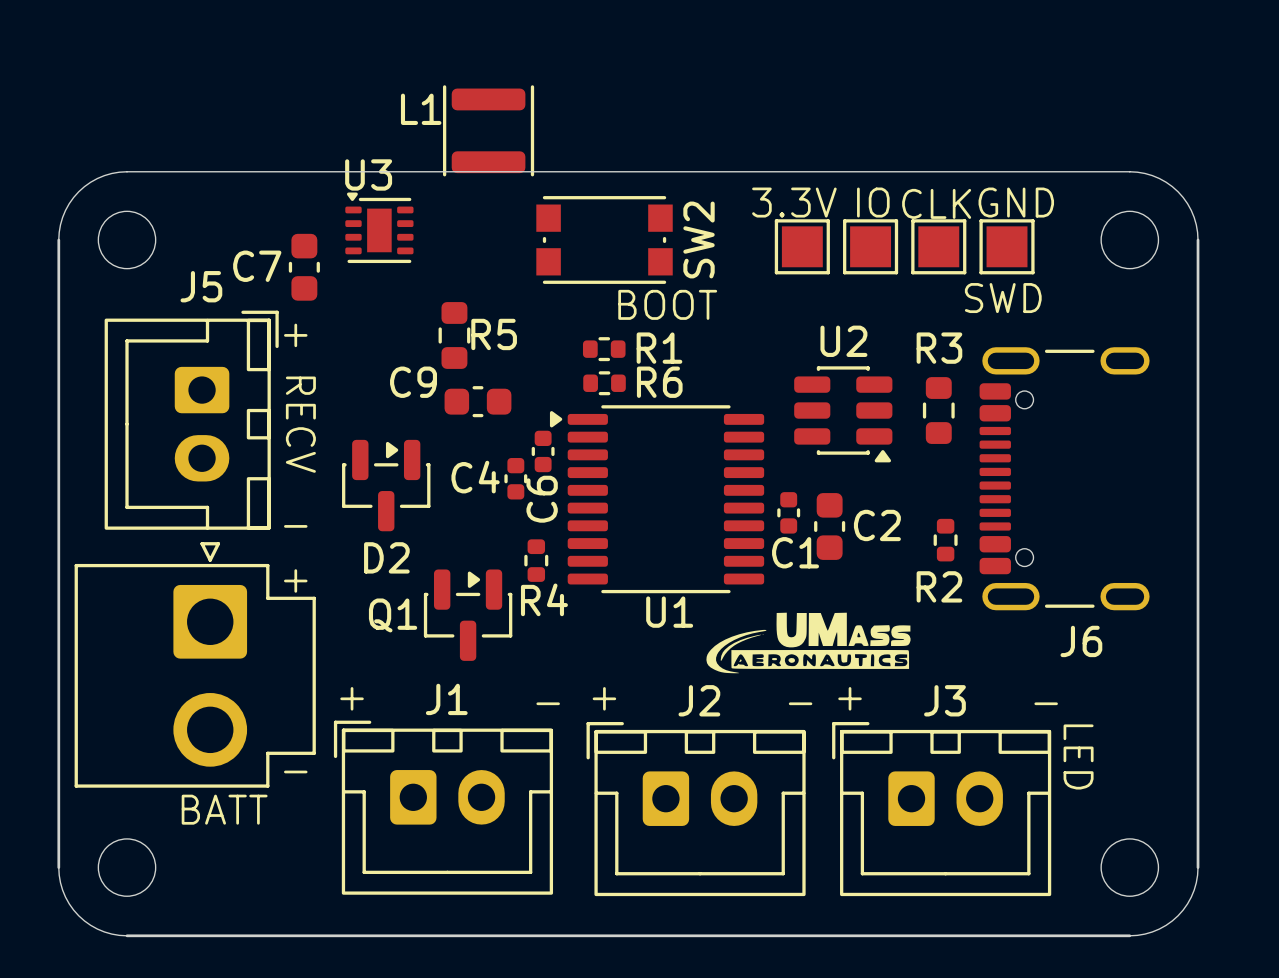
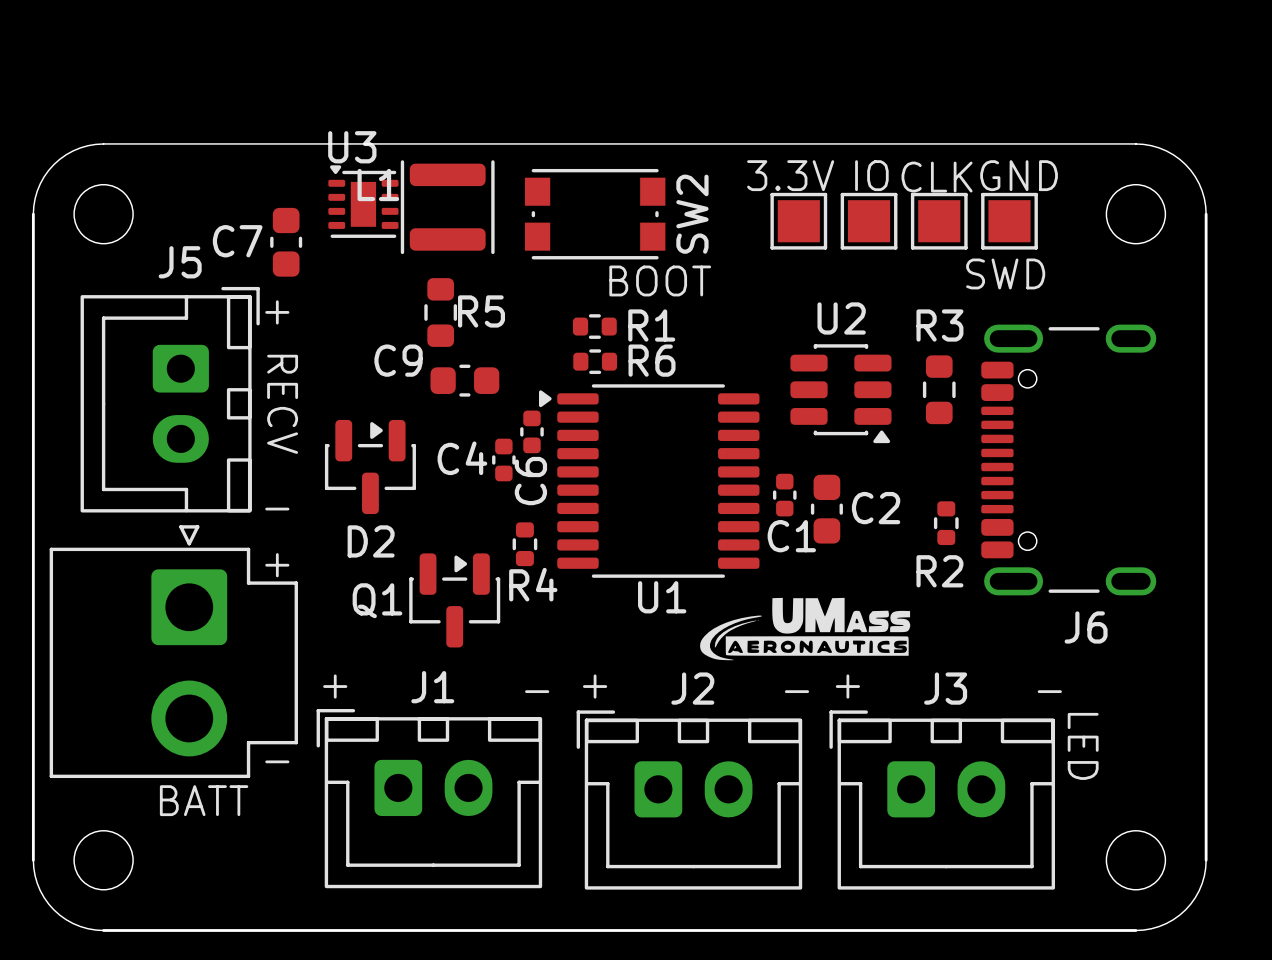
L1 position: (488, 130) -> (447, 207)

